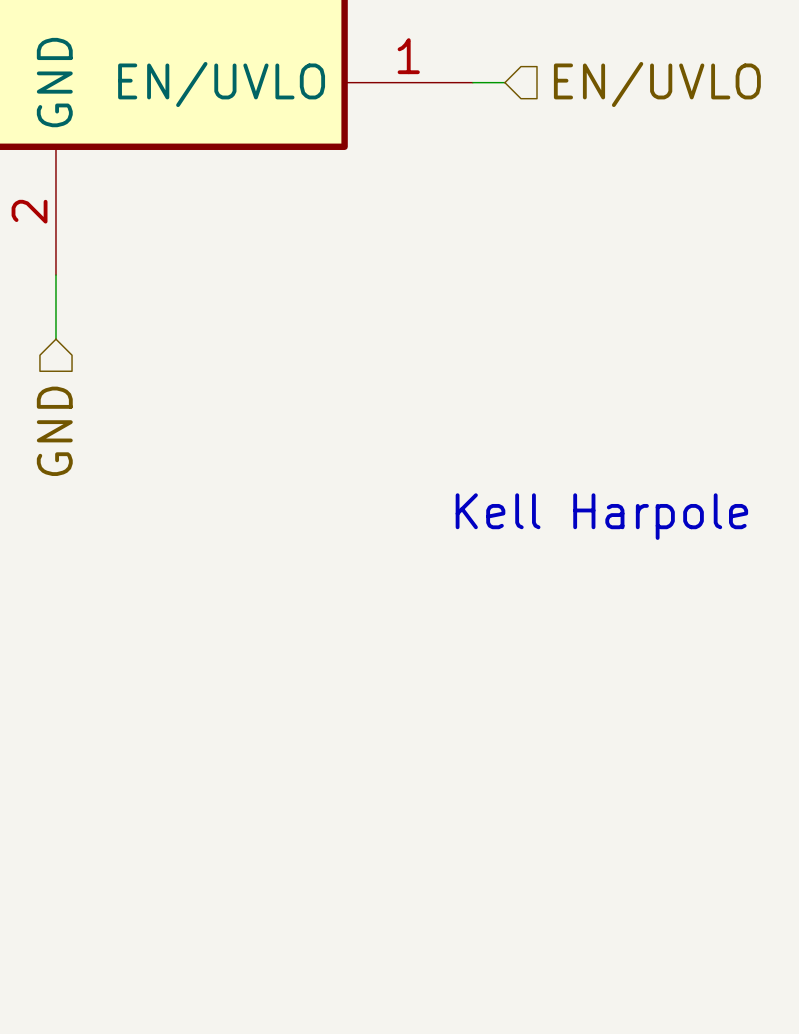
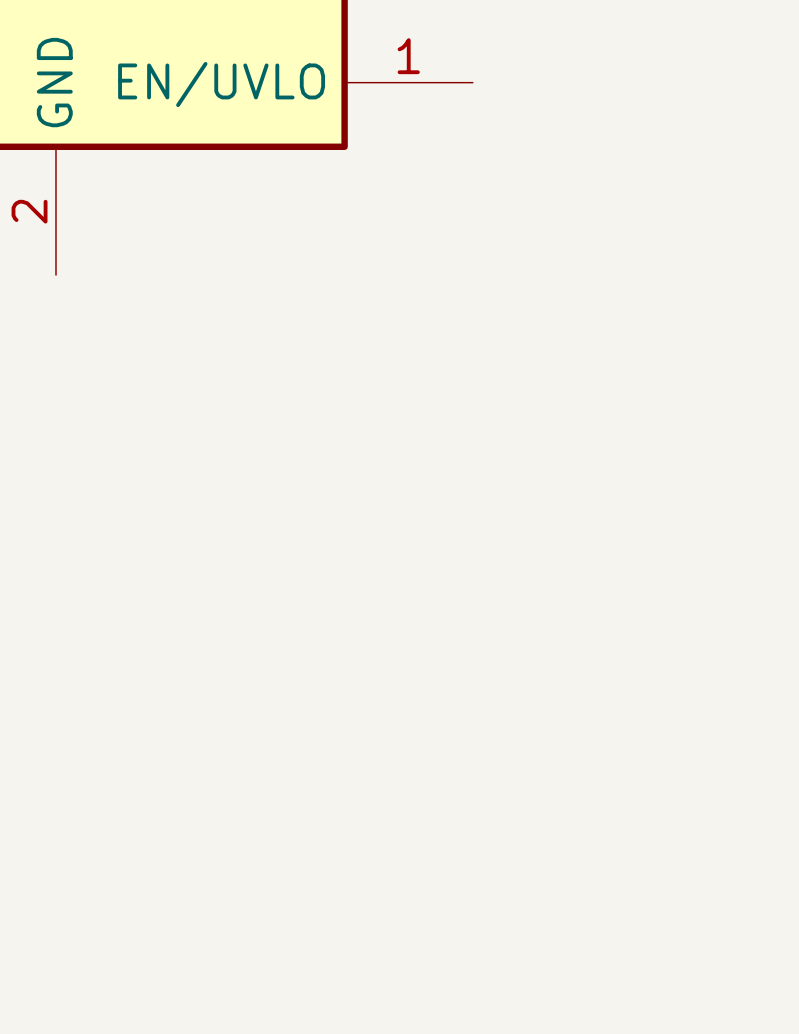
wire: (472, 82) (504, 82) -> none
hierarchical label: EN/UVLO (657, 84) -> none
wire: (55, 275) (55, 339) -> none
hierarchical label: GND (54, 431) -> none
text: Kell Harpole (601, 516) -> none

